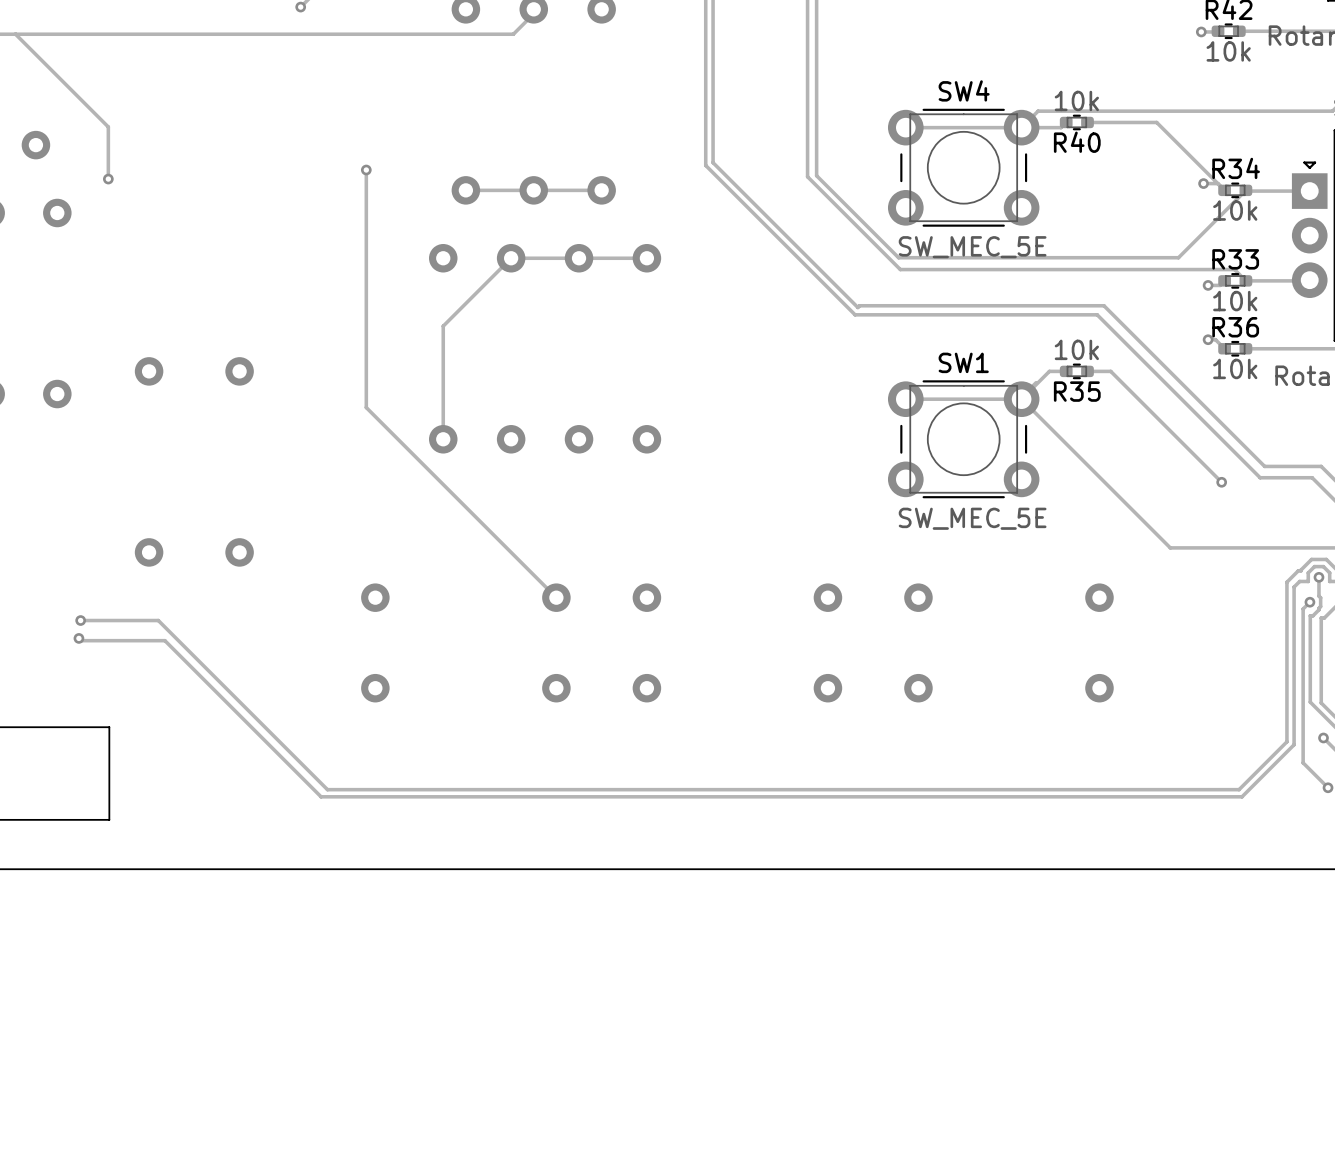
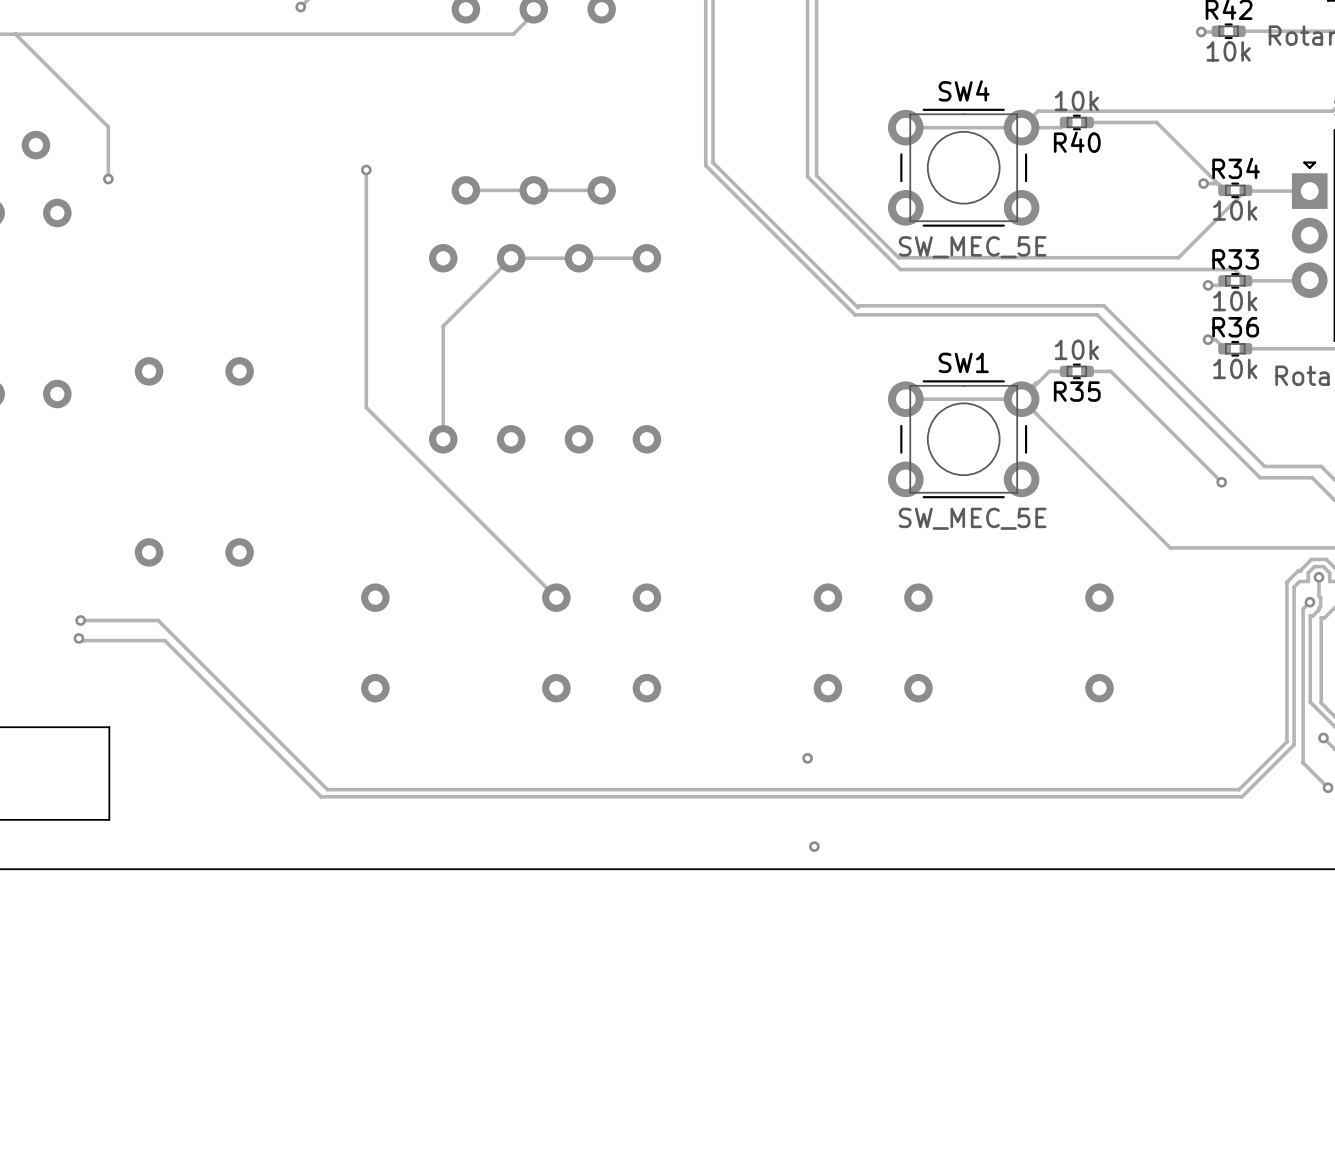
via: none -> (807, 758)
via: none -> (814, 846)

